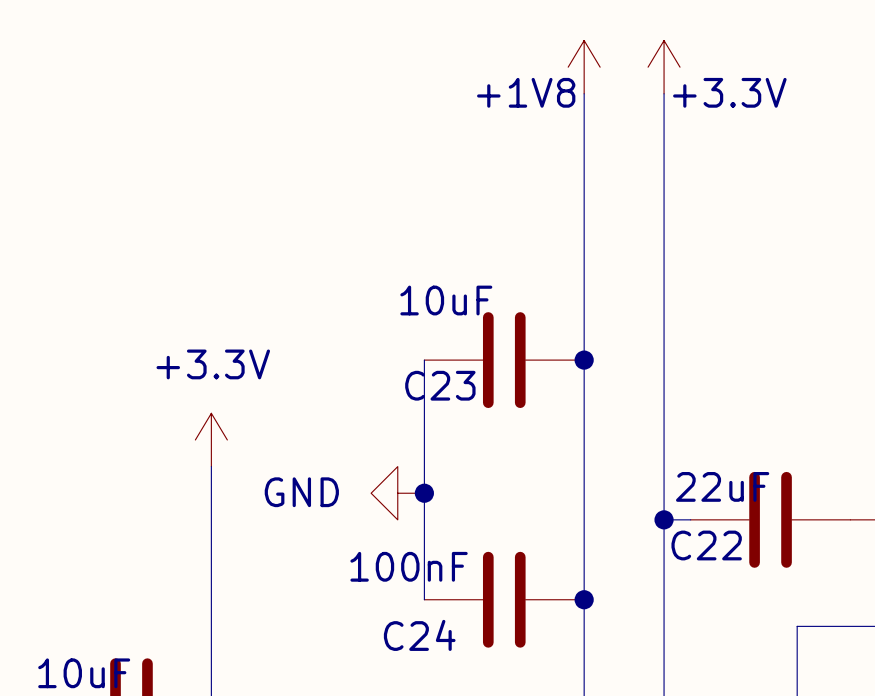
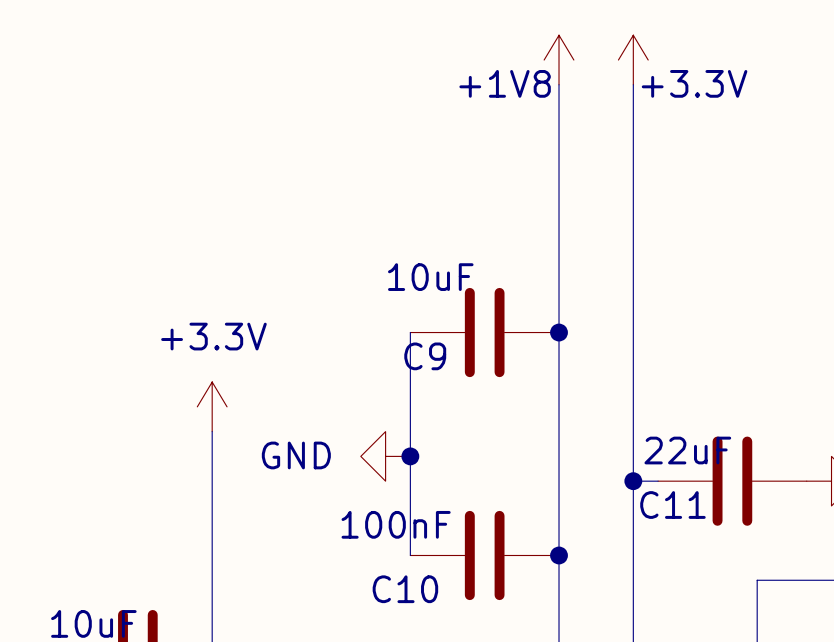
C23 name: C23 (440, 385) -> C9 (425, 356)
C22 name: C22 (706, 545) -> C11 (672, 505)
C24 name: C24 (419, 635) -> C10 (405, 589)

